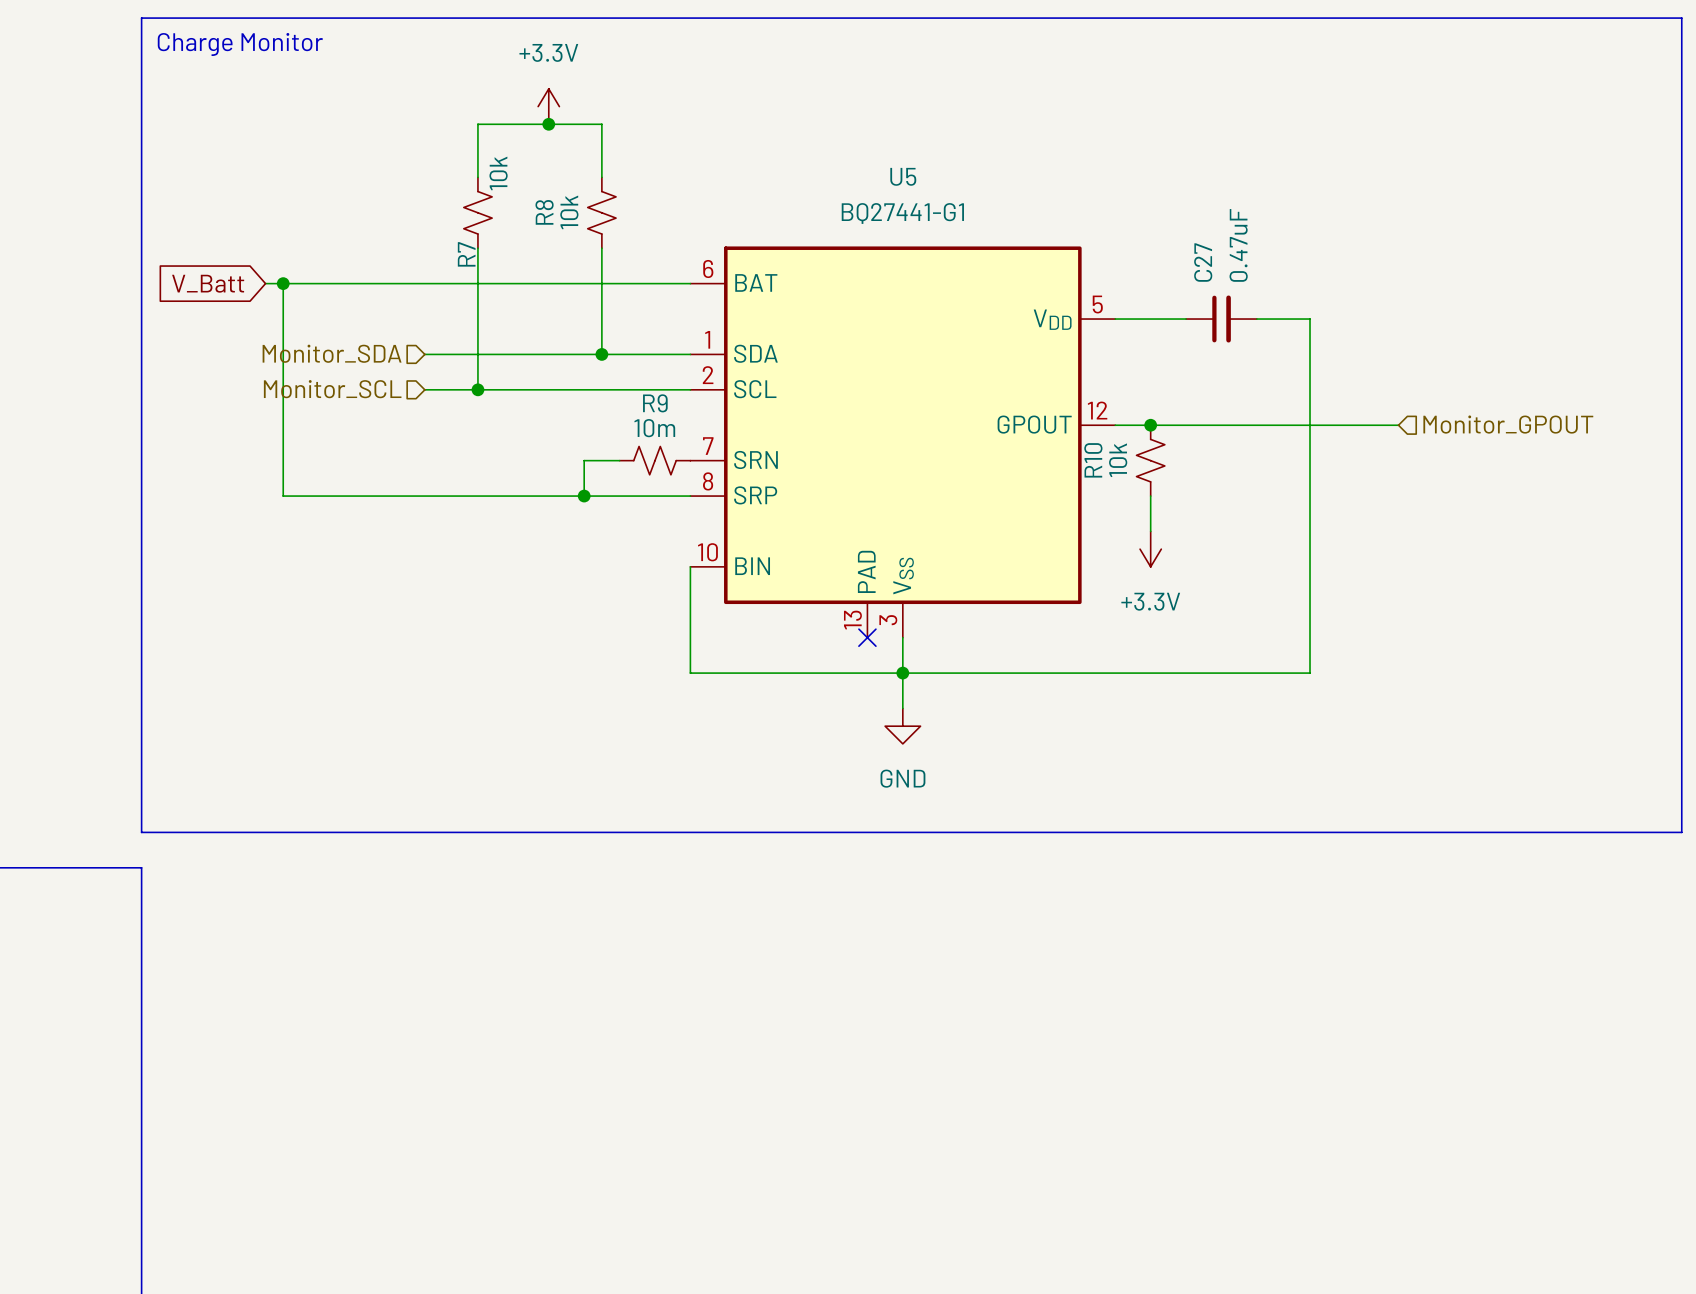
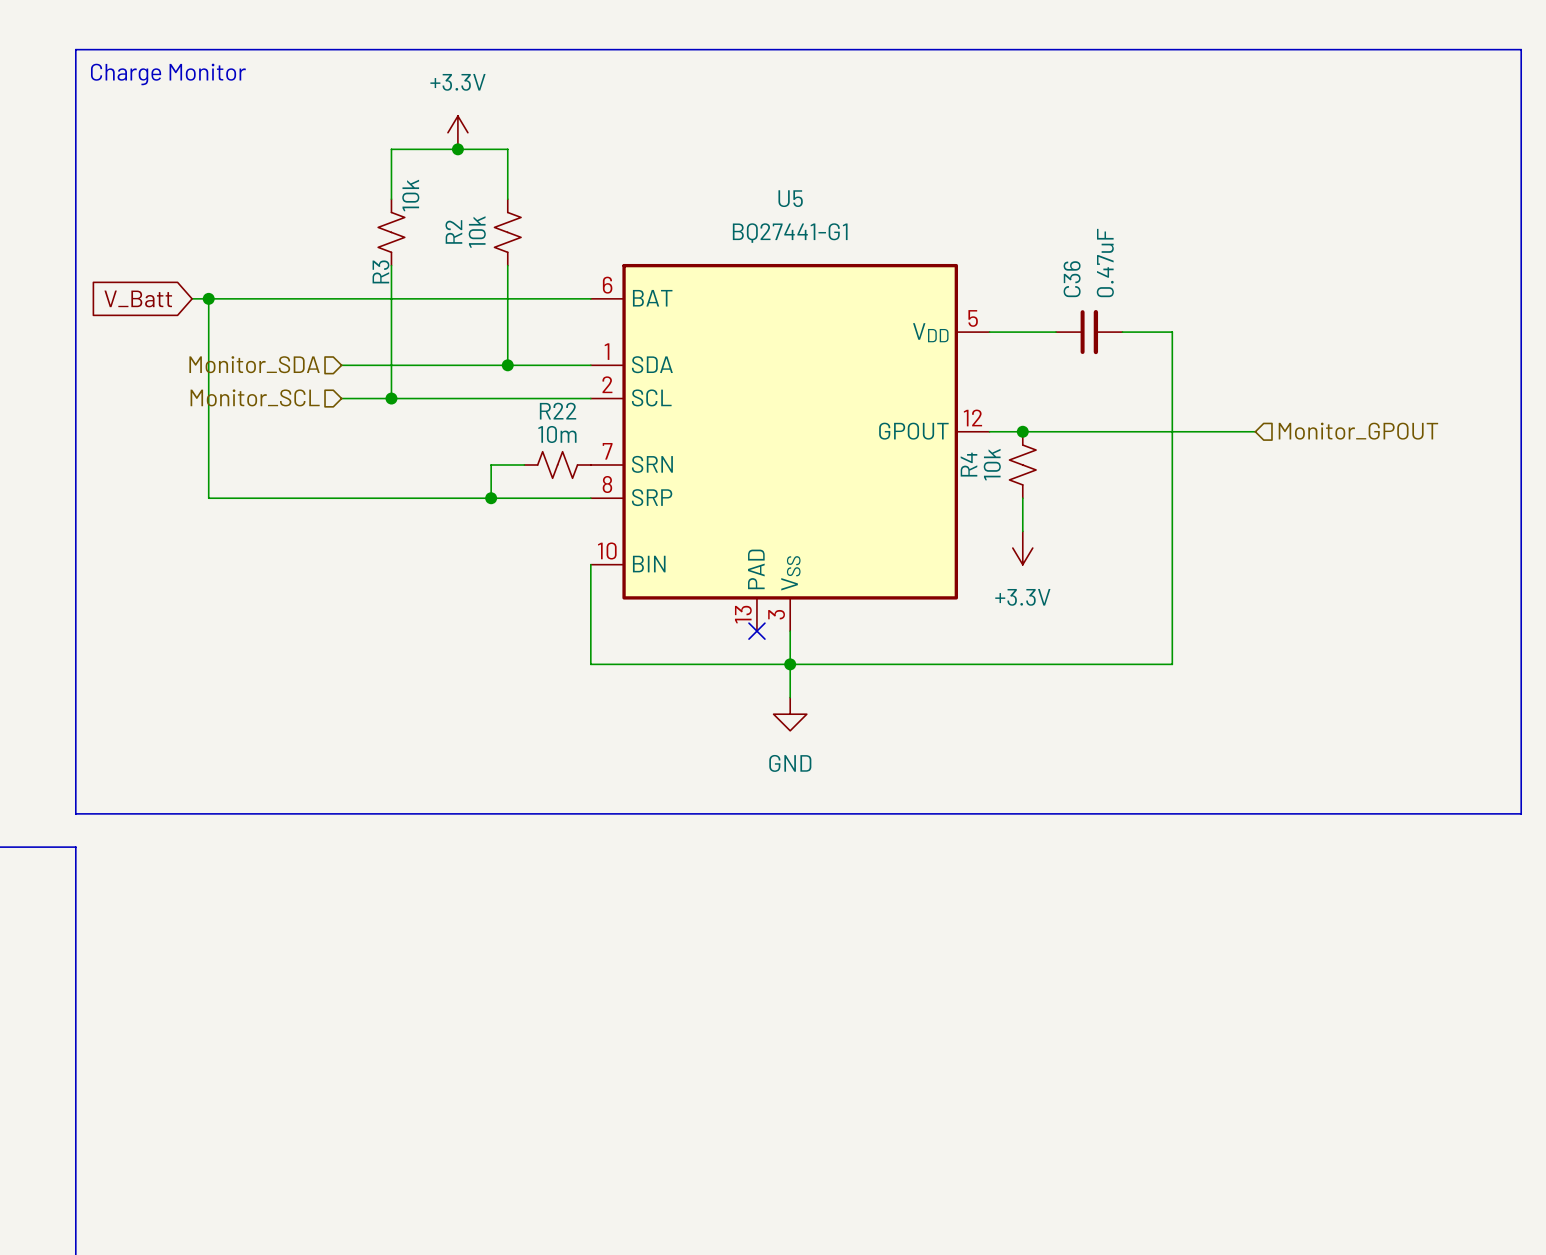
R8 name: R8 (544, 212) -> R2 (453, 231)
R7 name: R7 (466, 254) -> R3 (380, 271)
C27 name: C27 (1203, 262) -> C36 (1072, 279)
R9 name: R9 (655, 403) -> R22 (558, 411)
R10 name: R10 (1093, 460) -> R4 (969, 464)

